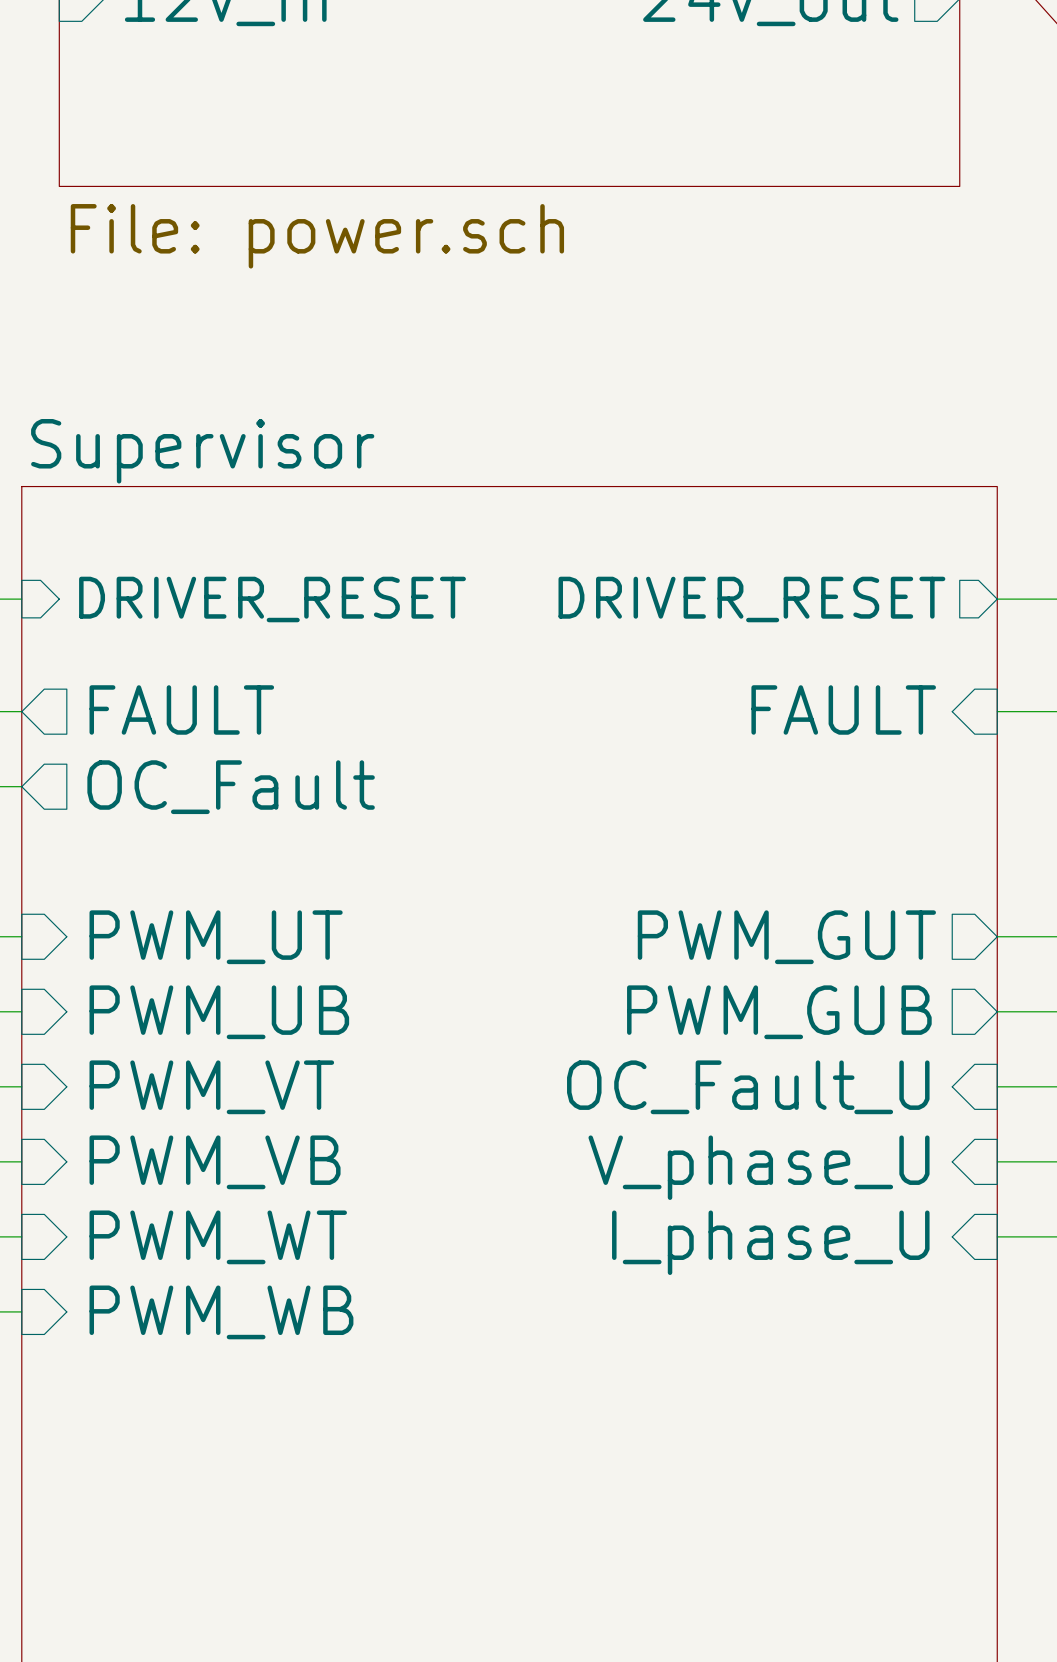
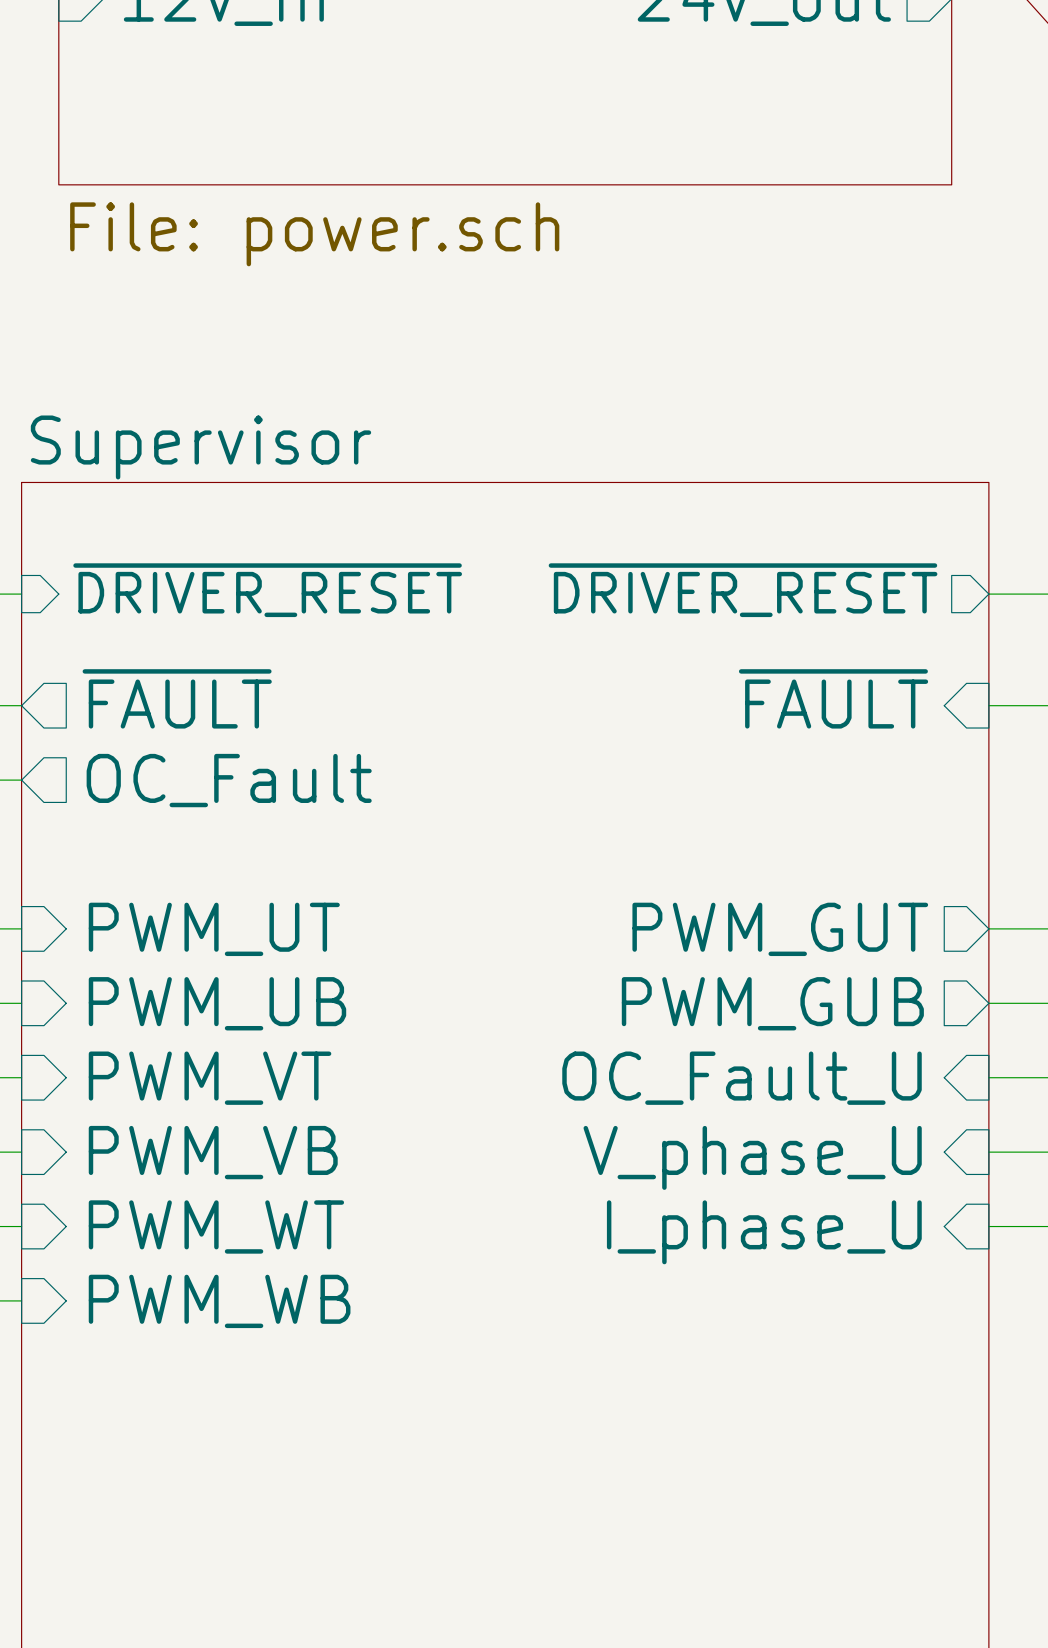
sheet pin: DRIVER_RESET (272, 599) -> ~{DRIVER_RESET} (267, 590)
sheet pin: DRIVER_RESET (751, 599) -> ~{DRIVER_RESET} (743, 590)
sheet pin: FAULT (181, 709) -> ~{FAULT} (177, 698)
sheet pin: FAULT (843, 709) -> ~{FAULT} (833, 698)

